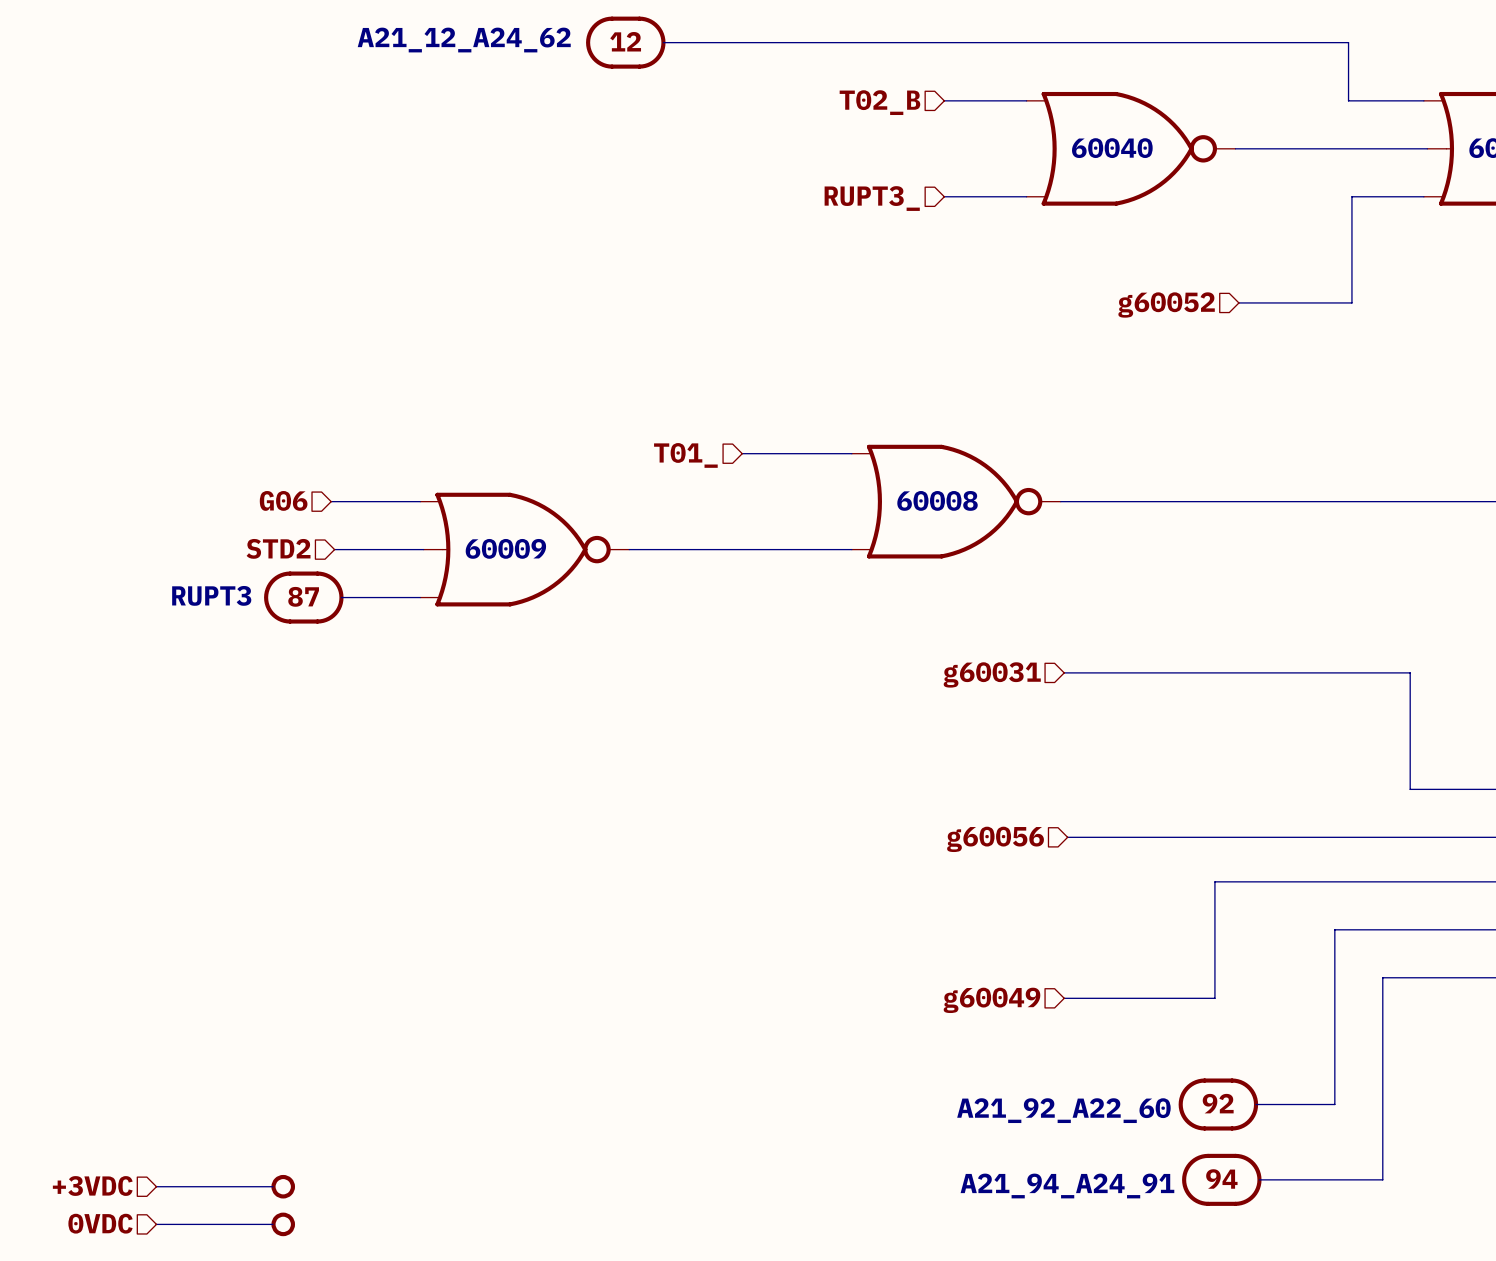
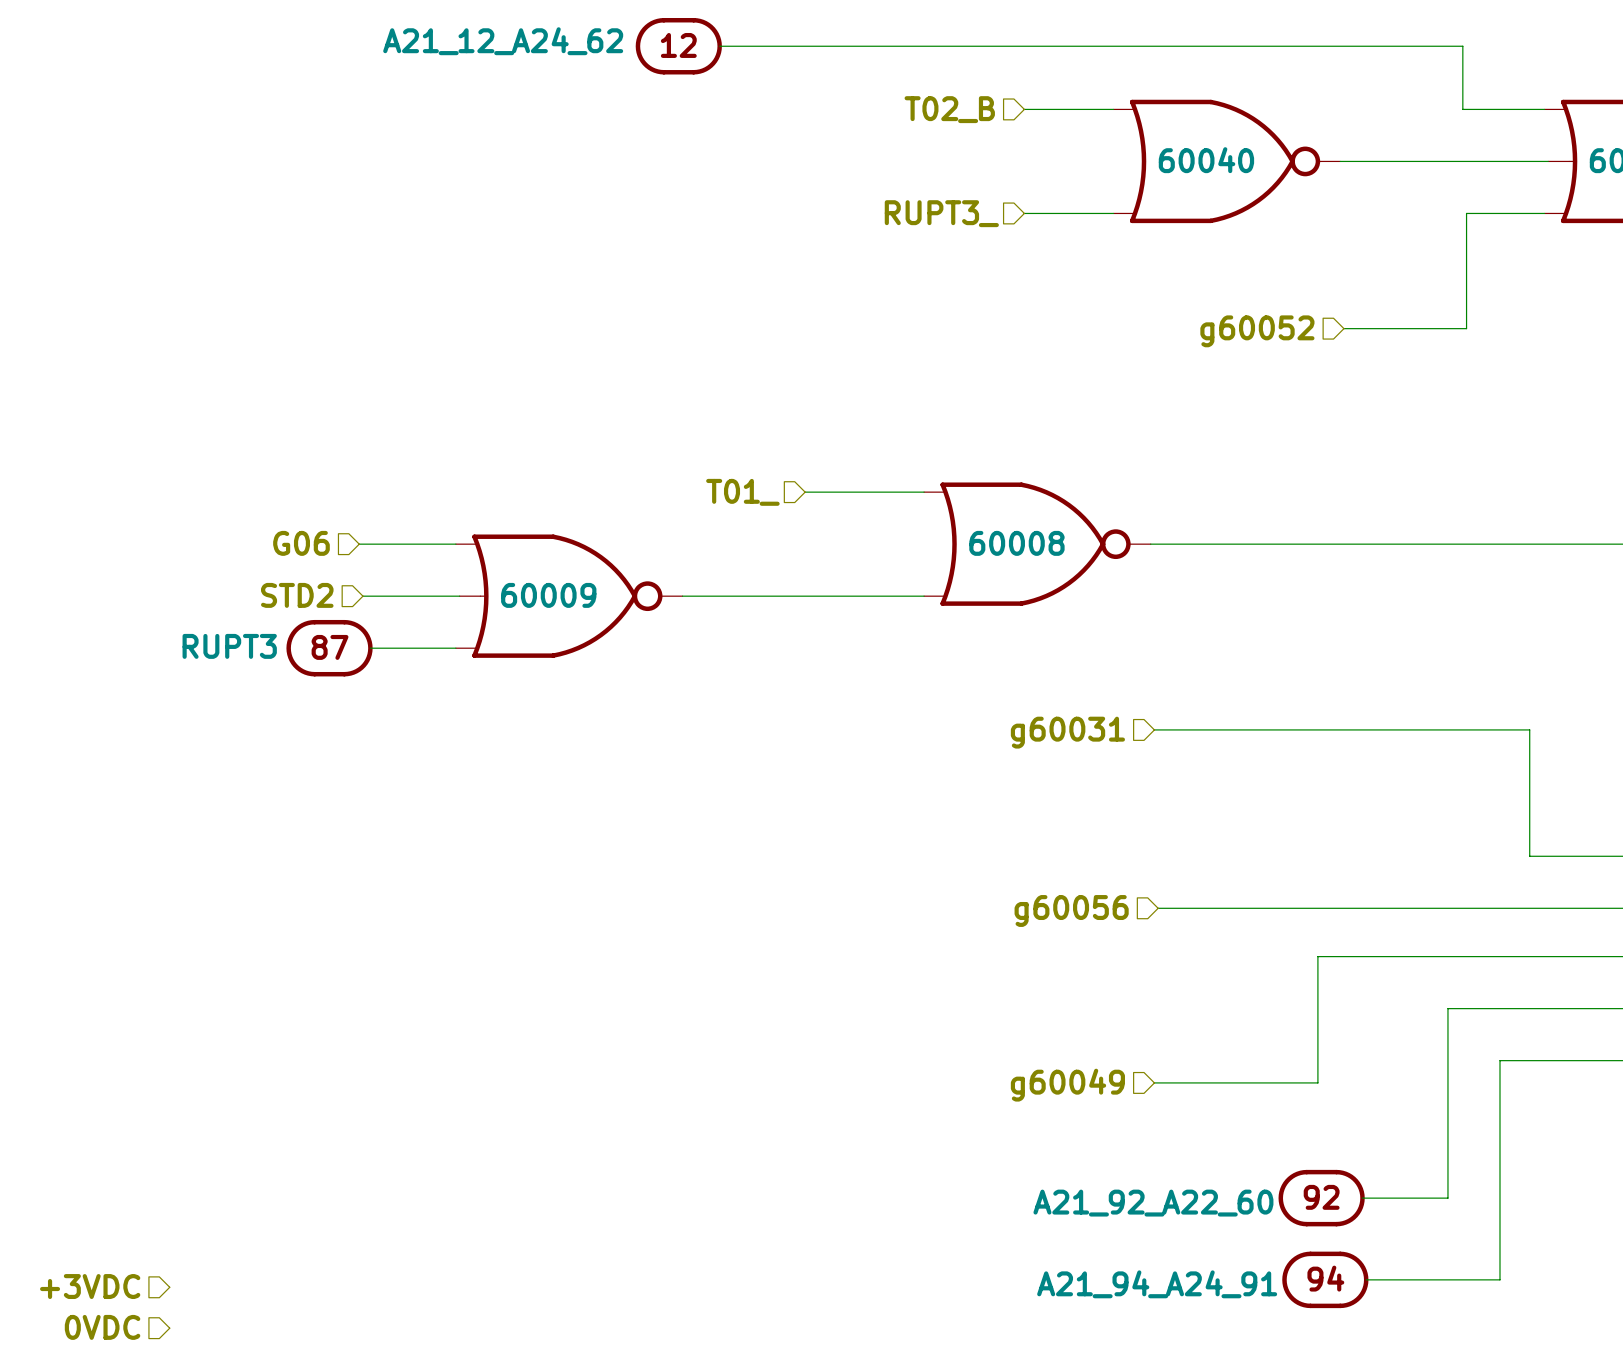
wire: (156, 1186) (272, 1186) -> none
part: (283, 1186) -> none
wire: (156, 1224) (272, 1224) -> none
part: (283, 1224) -> none

